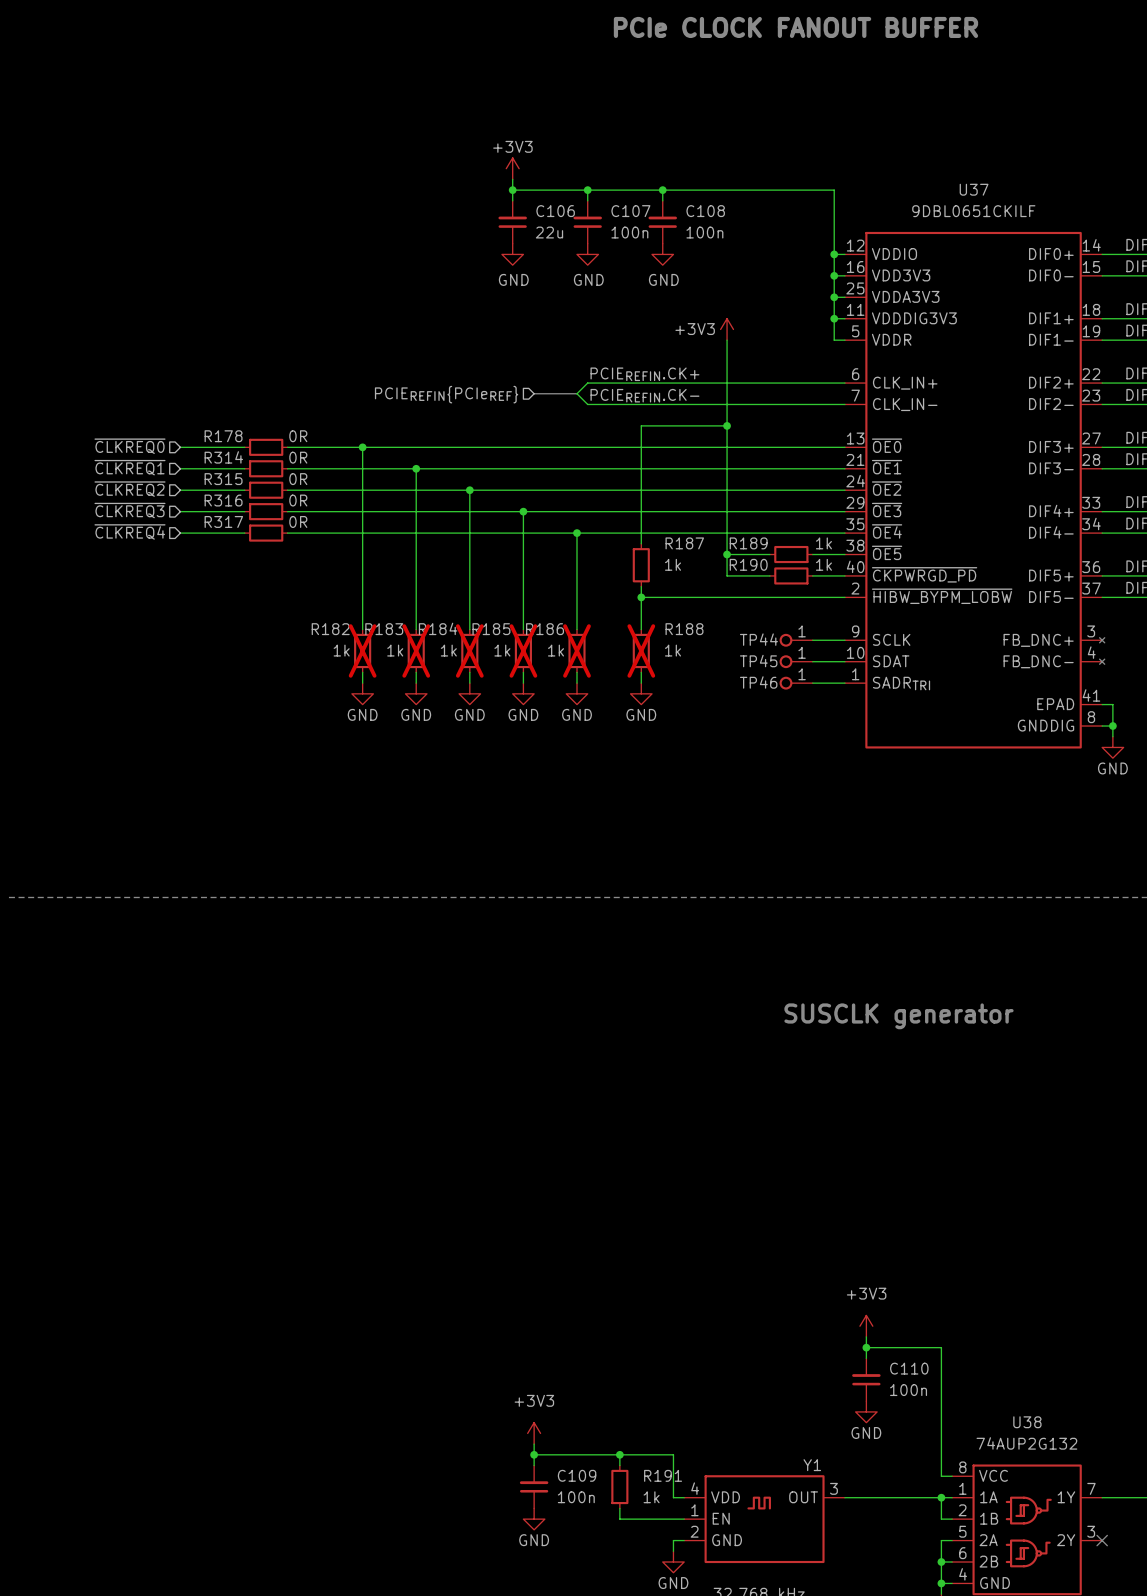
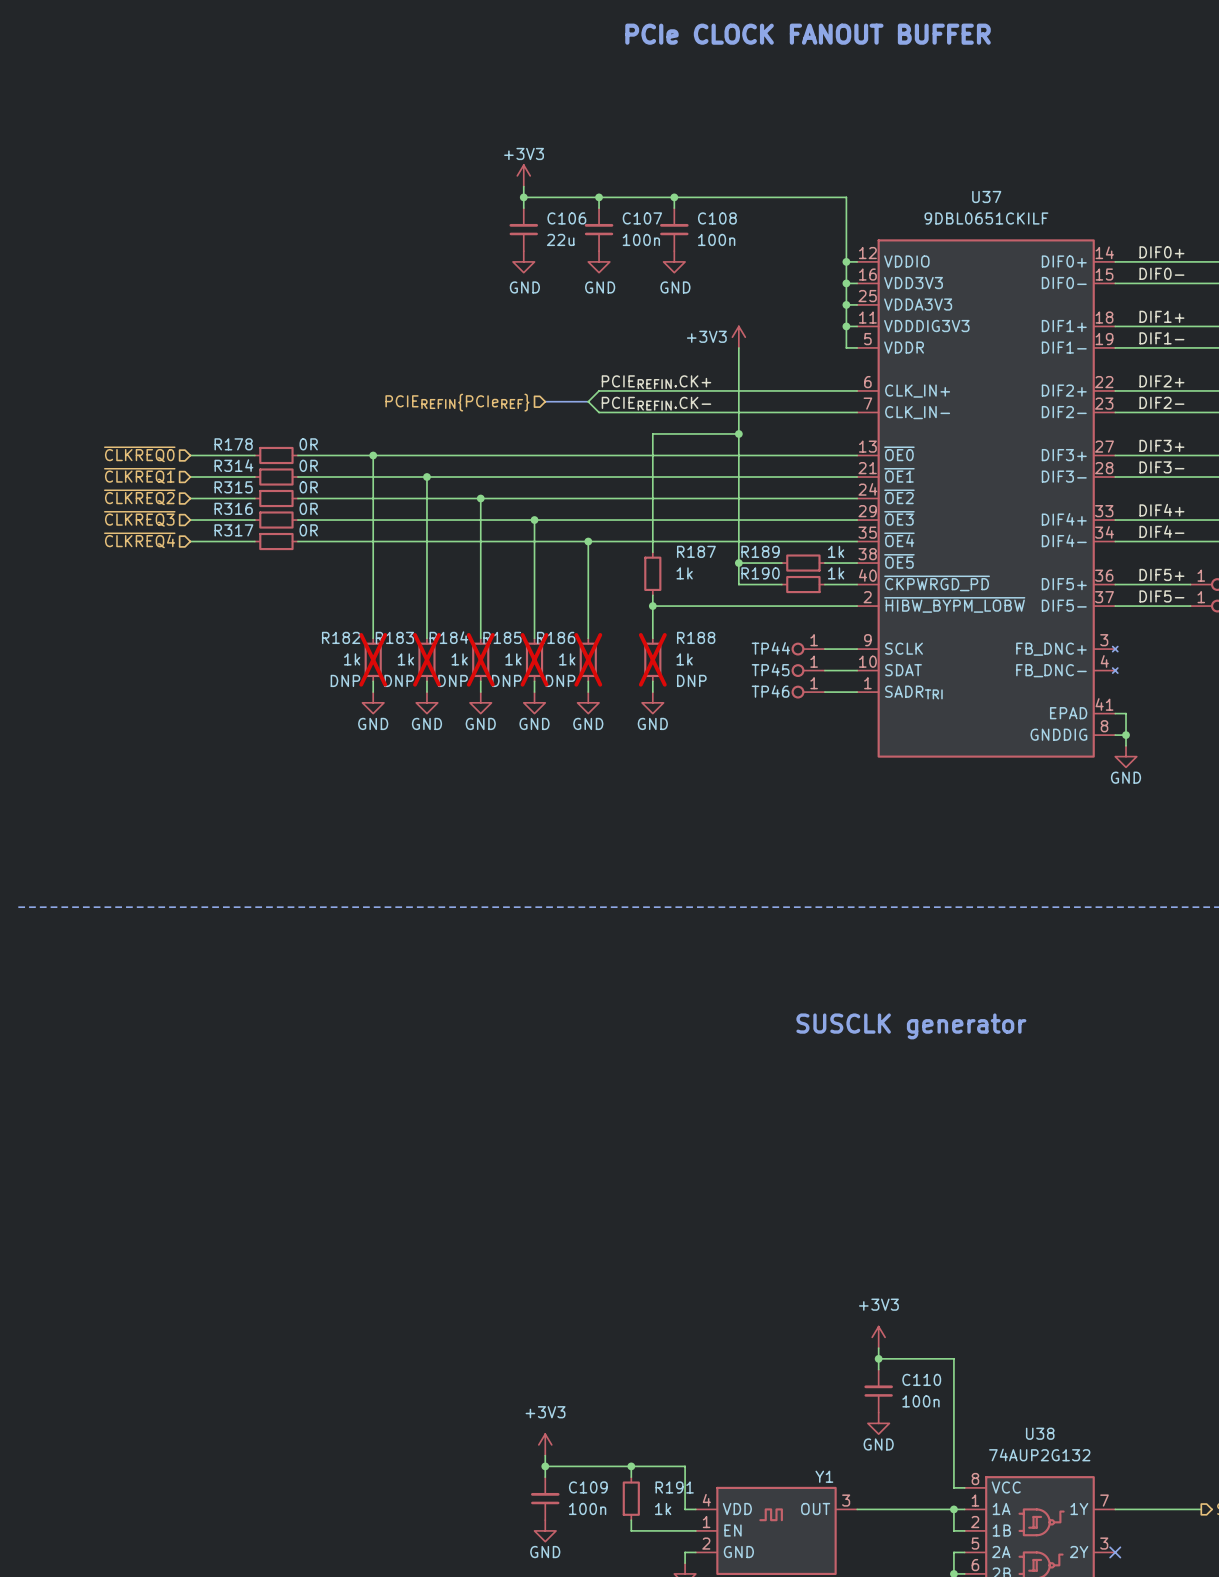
R182 text: none -> DNP (345, 680)
R183 text: none -> DNP (399, 680)
R184 text: none -> DNP (453, 680)
R185 text: none -> DNP (506, 680)
R186 text: none -> DNP (560, 680)
R188 text: none -> DNP (691, 680)

